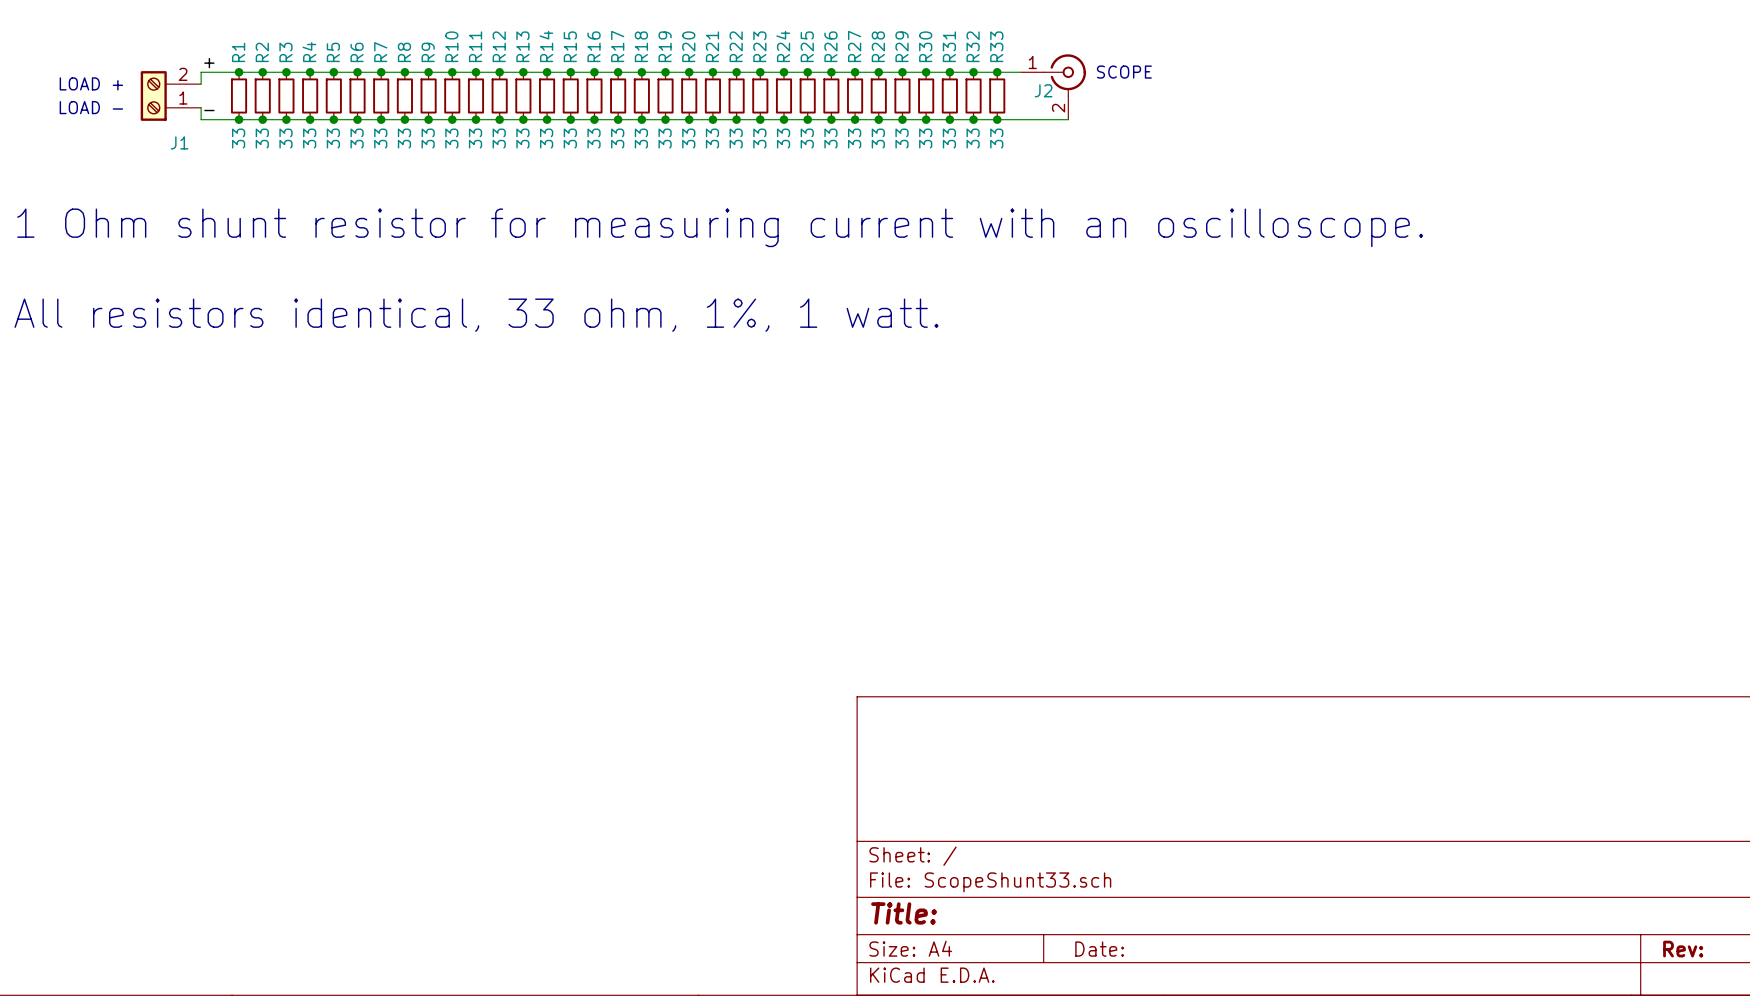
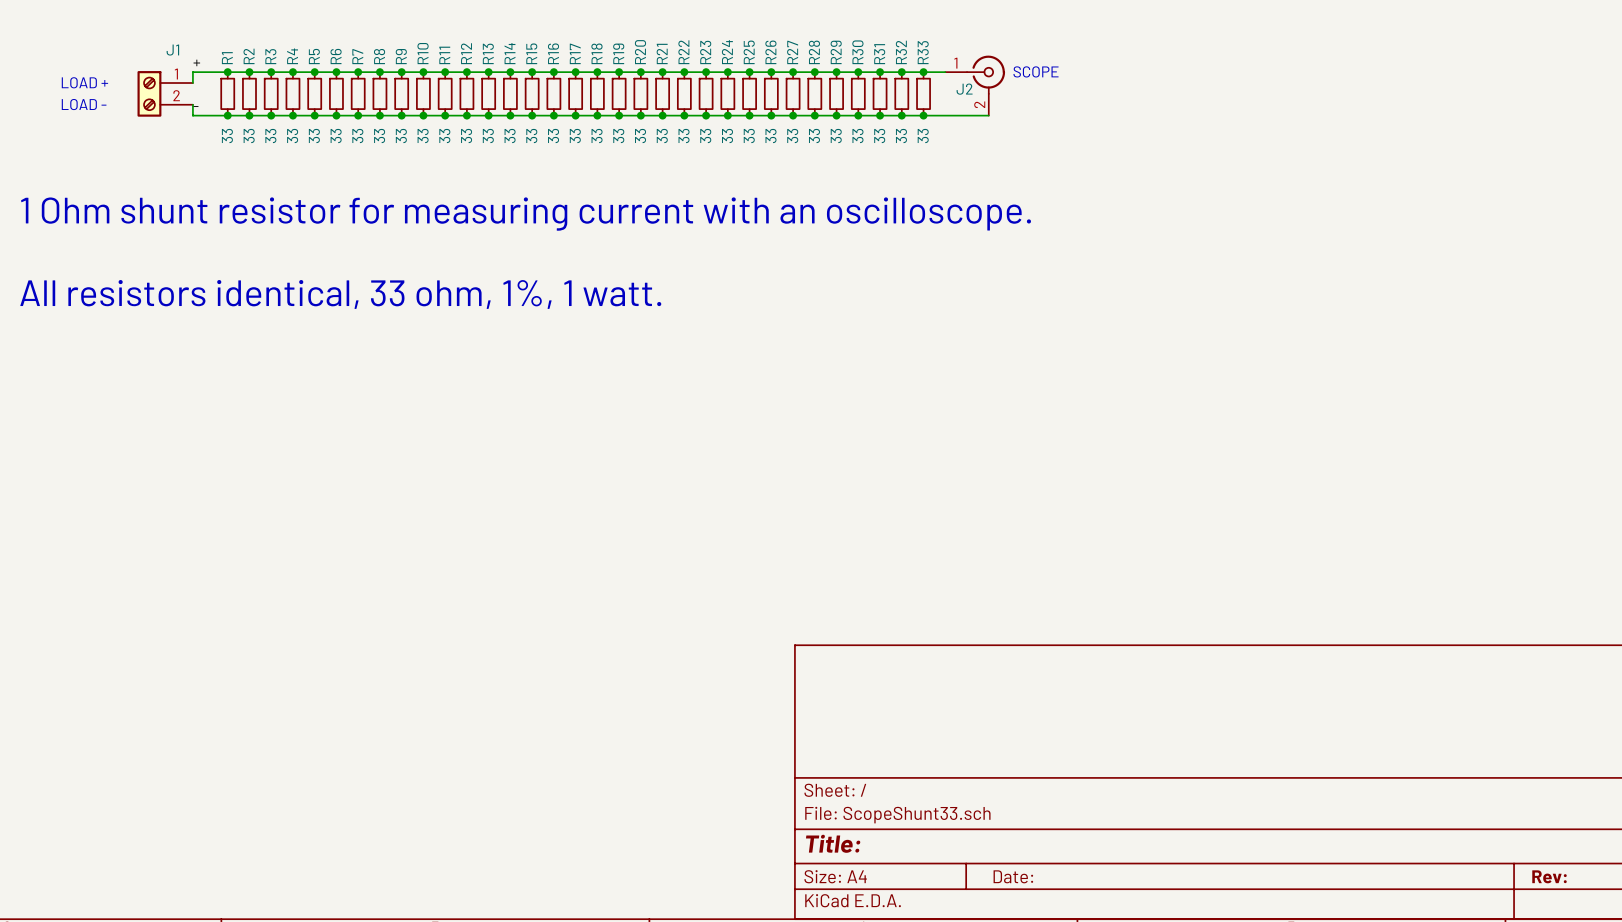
J1 flip: as is (153, 95) -> up-down (149, 93)

